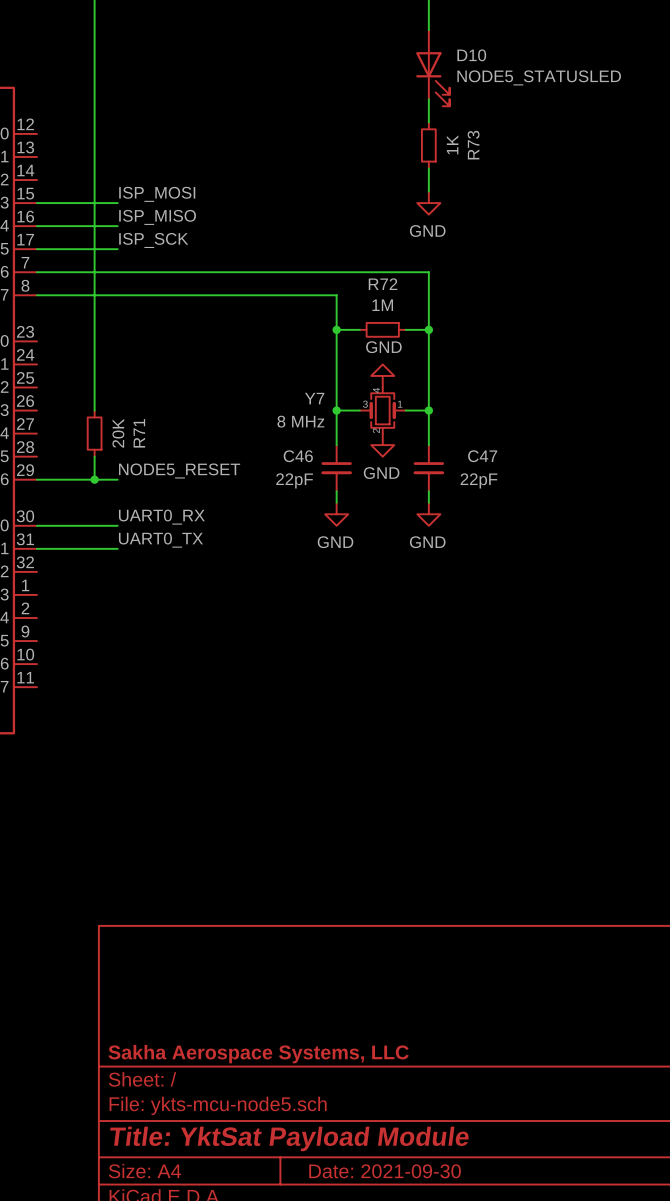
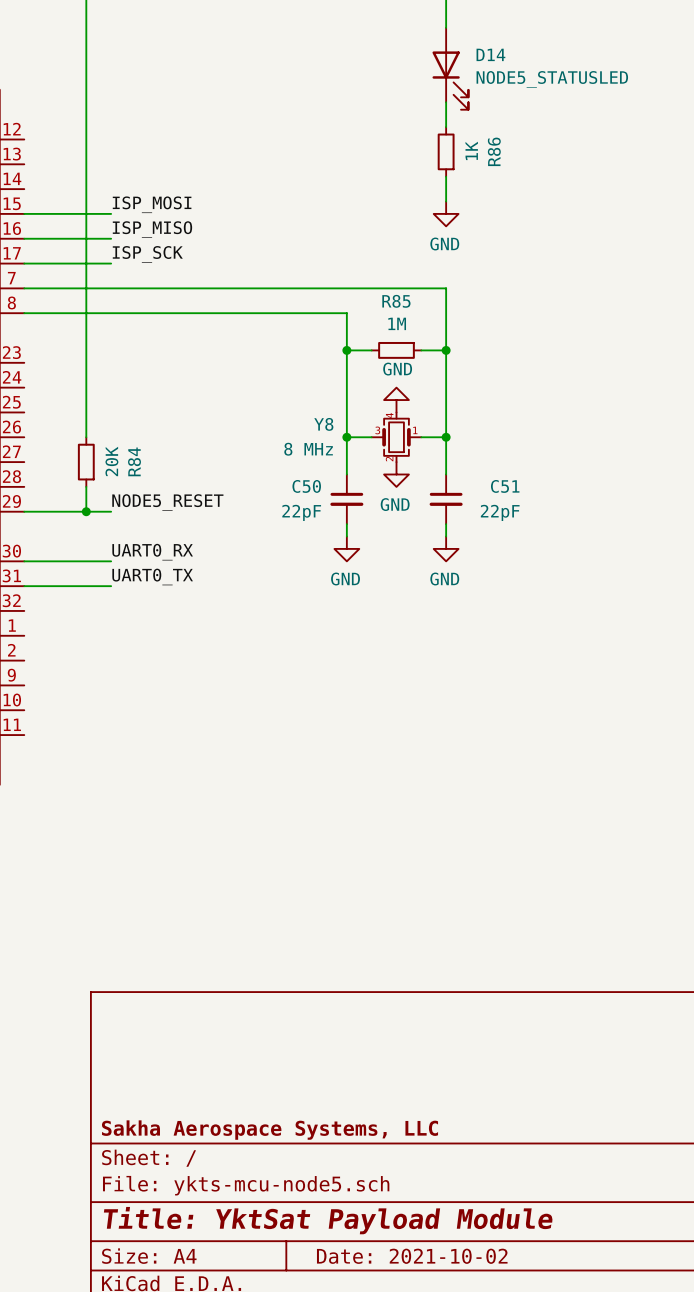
D10 name: D10 (471, 55) -> D14 (490, 54)
R73 name: R73 (473, 145) -> R86 (494, 151)
R72 name: R72 (383, 284) -> R85 (396, 301)
Y7 name: Y7 (314, 398) -> Y8 (323, 424)
R71 name: R71 (139, 433) -> R84 (134, 461)
C46 name: C46 (298, 456) -> C50 (306, 486)
C47 name: C47 (482, 456) -> C51 (505, 486)
title block: Date: 2021-09-30 (385, 1171) -> Date: 2021-10-02 (412, 1256)

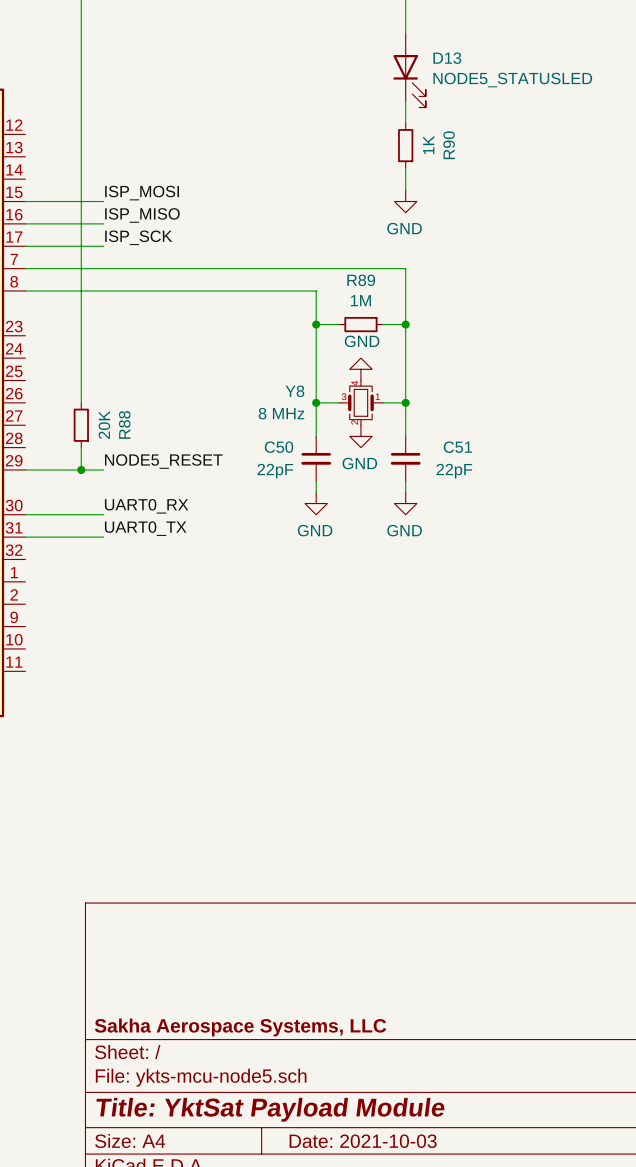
D14 name: D14 (490, 54) -> D13 (447, 58)
R86 name: R86 (494, 151) -> R90 (449, 145)
R85 name: R85 (396, 301) -> R89 (361, 280)
R84 name: R84 (134, 461) -> R88 (124, 424)
title block: Date: 2021-10-02 (412, 1256) -> Date: 2021-10-03 (363, 1141)

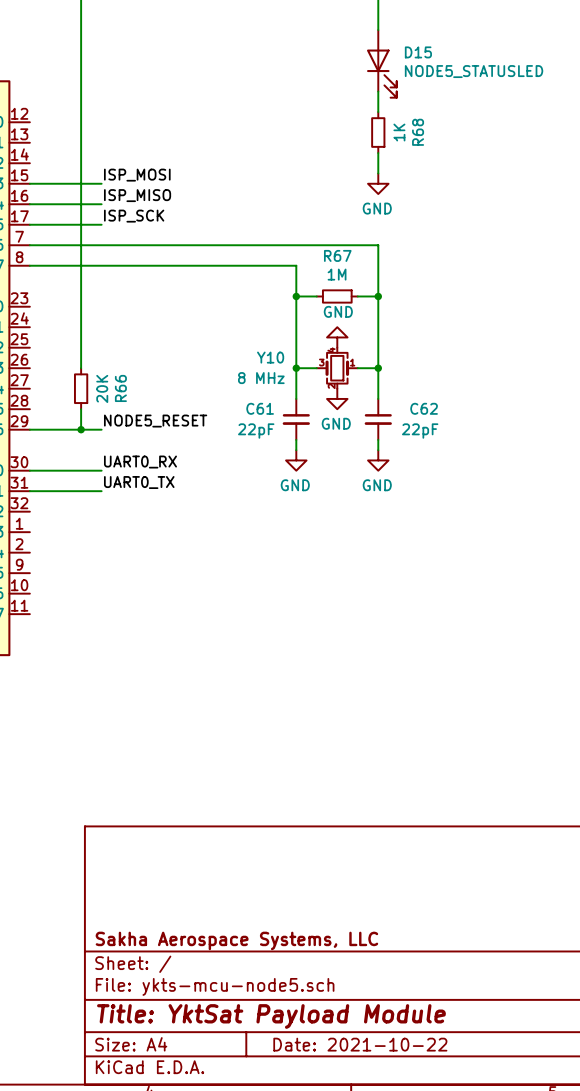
D13 name: D13 (447, 58) -> D15 (418, 52)
R90 name: R90 (449, 145) -> R68 (418, 132)
R89 name: R89 (361, 280) -> R67 (337, 255)
Y8 name: Y8 (294, 391) -> Y10 (270, 357)
R88 name: R88 (124, 424) -> R66 (120, 388)
C50 name: C50 (279, 447) -> C61 (260, 408)
C51 name: C51 (457, 447) -> C62 (424, 408)
title block: Date: 2021-10-03 (363, 1141) -> Date: 2021-10-22 (360, 1044)

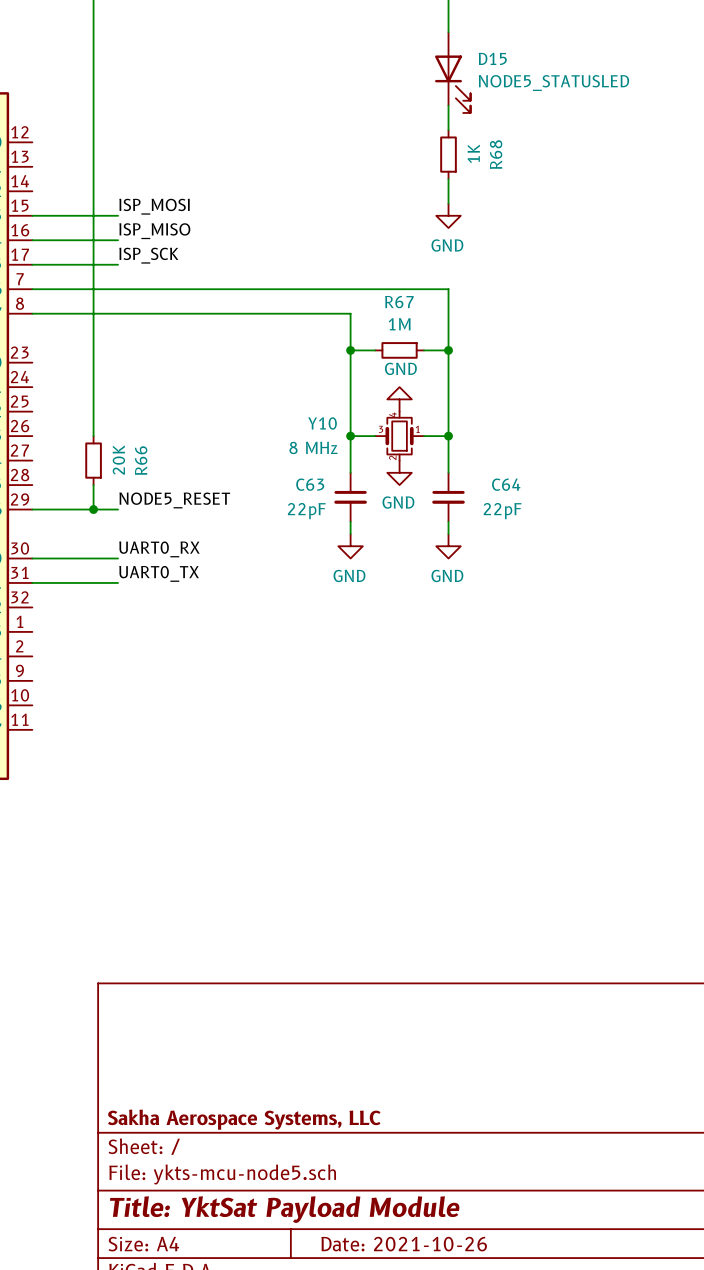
C61 name: C61 (260, 408) -> C63 (310, 484)
C62 name: C62 (424, 408) -> C64 (506, 484)
title block: Date: 2021-10-22 (360, 1044) -> Date: 2021-10-26 (404, 1244)

